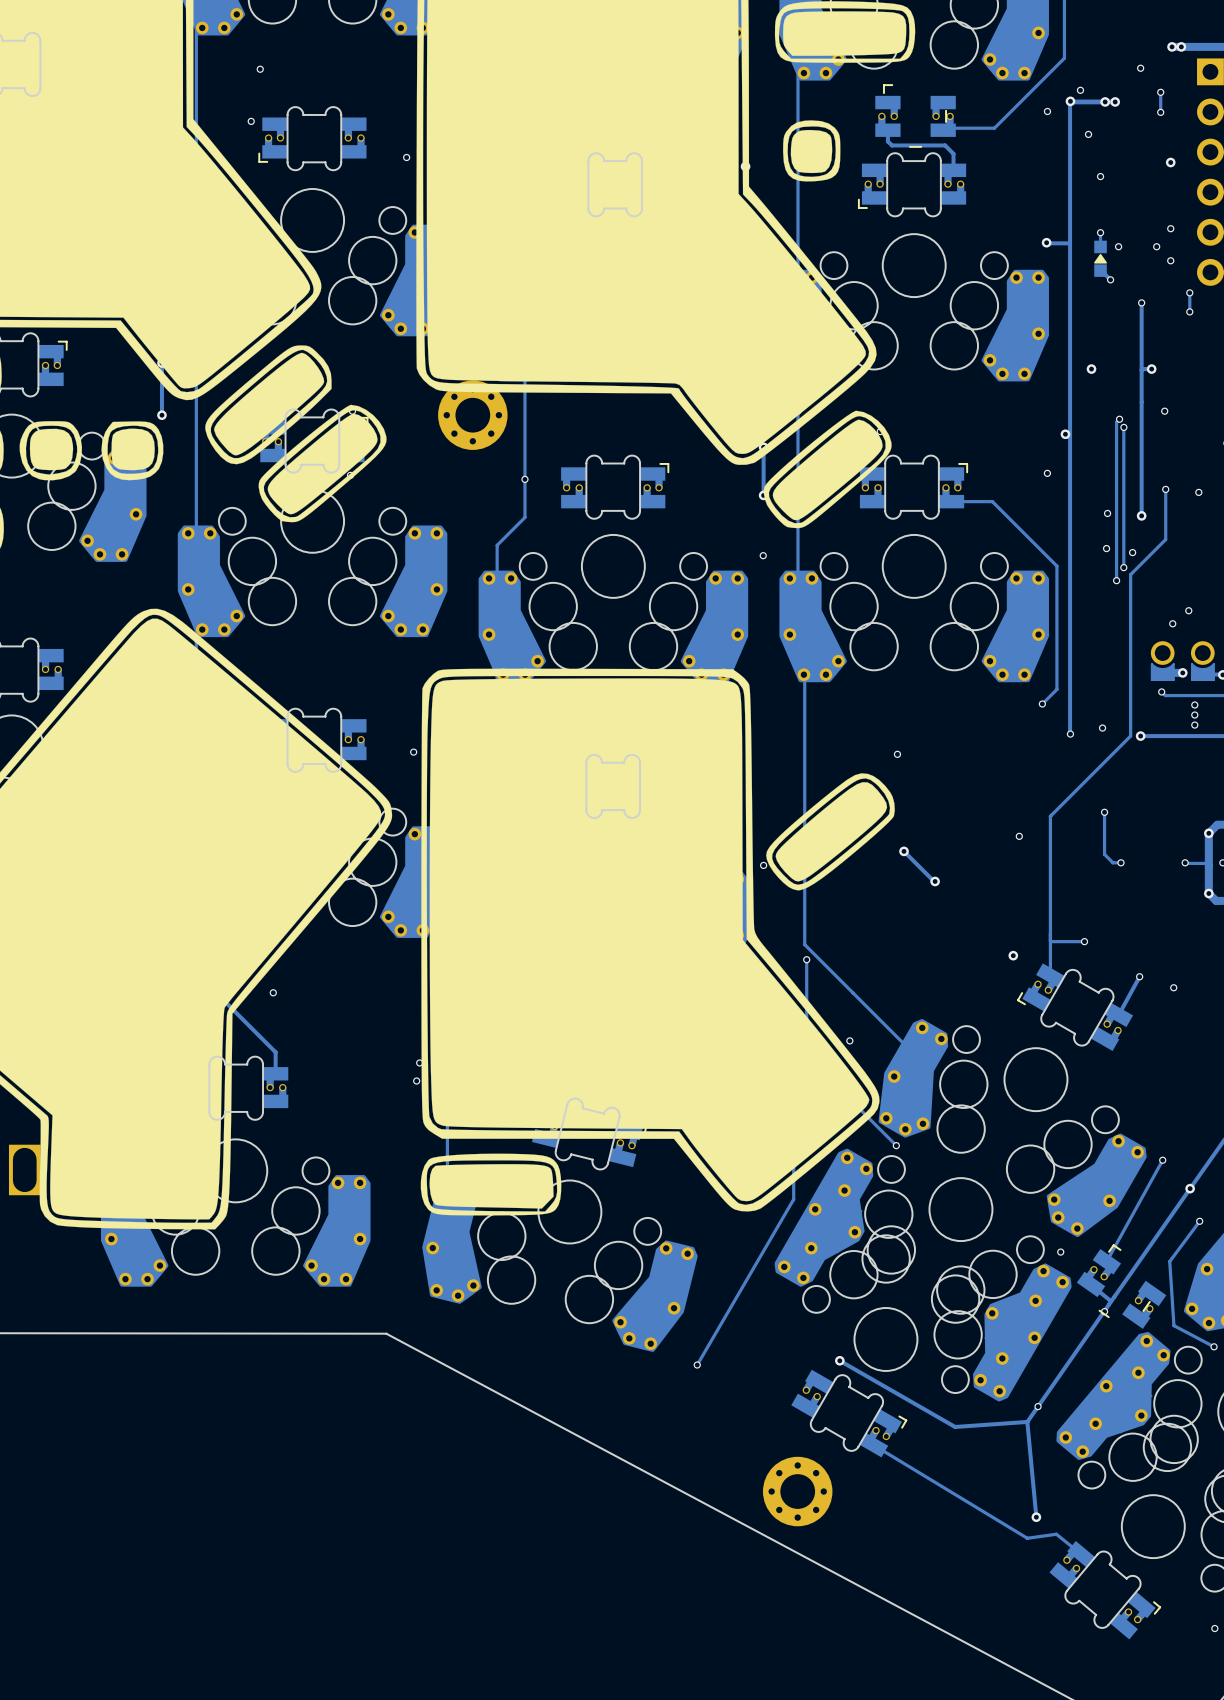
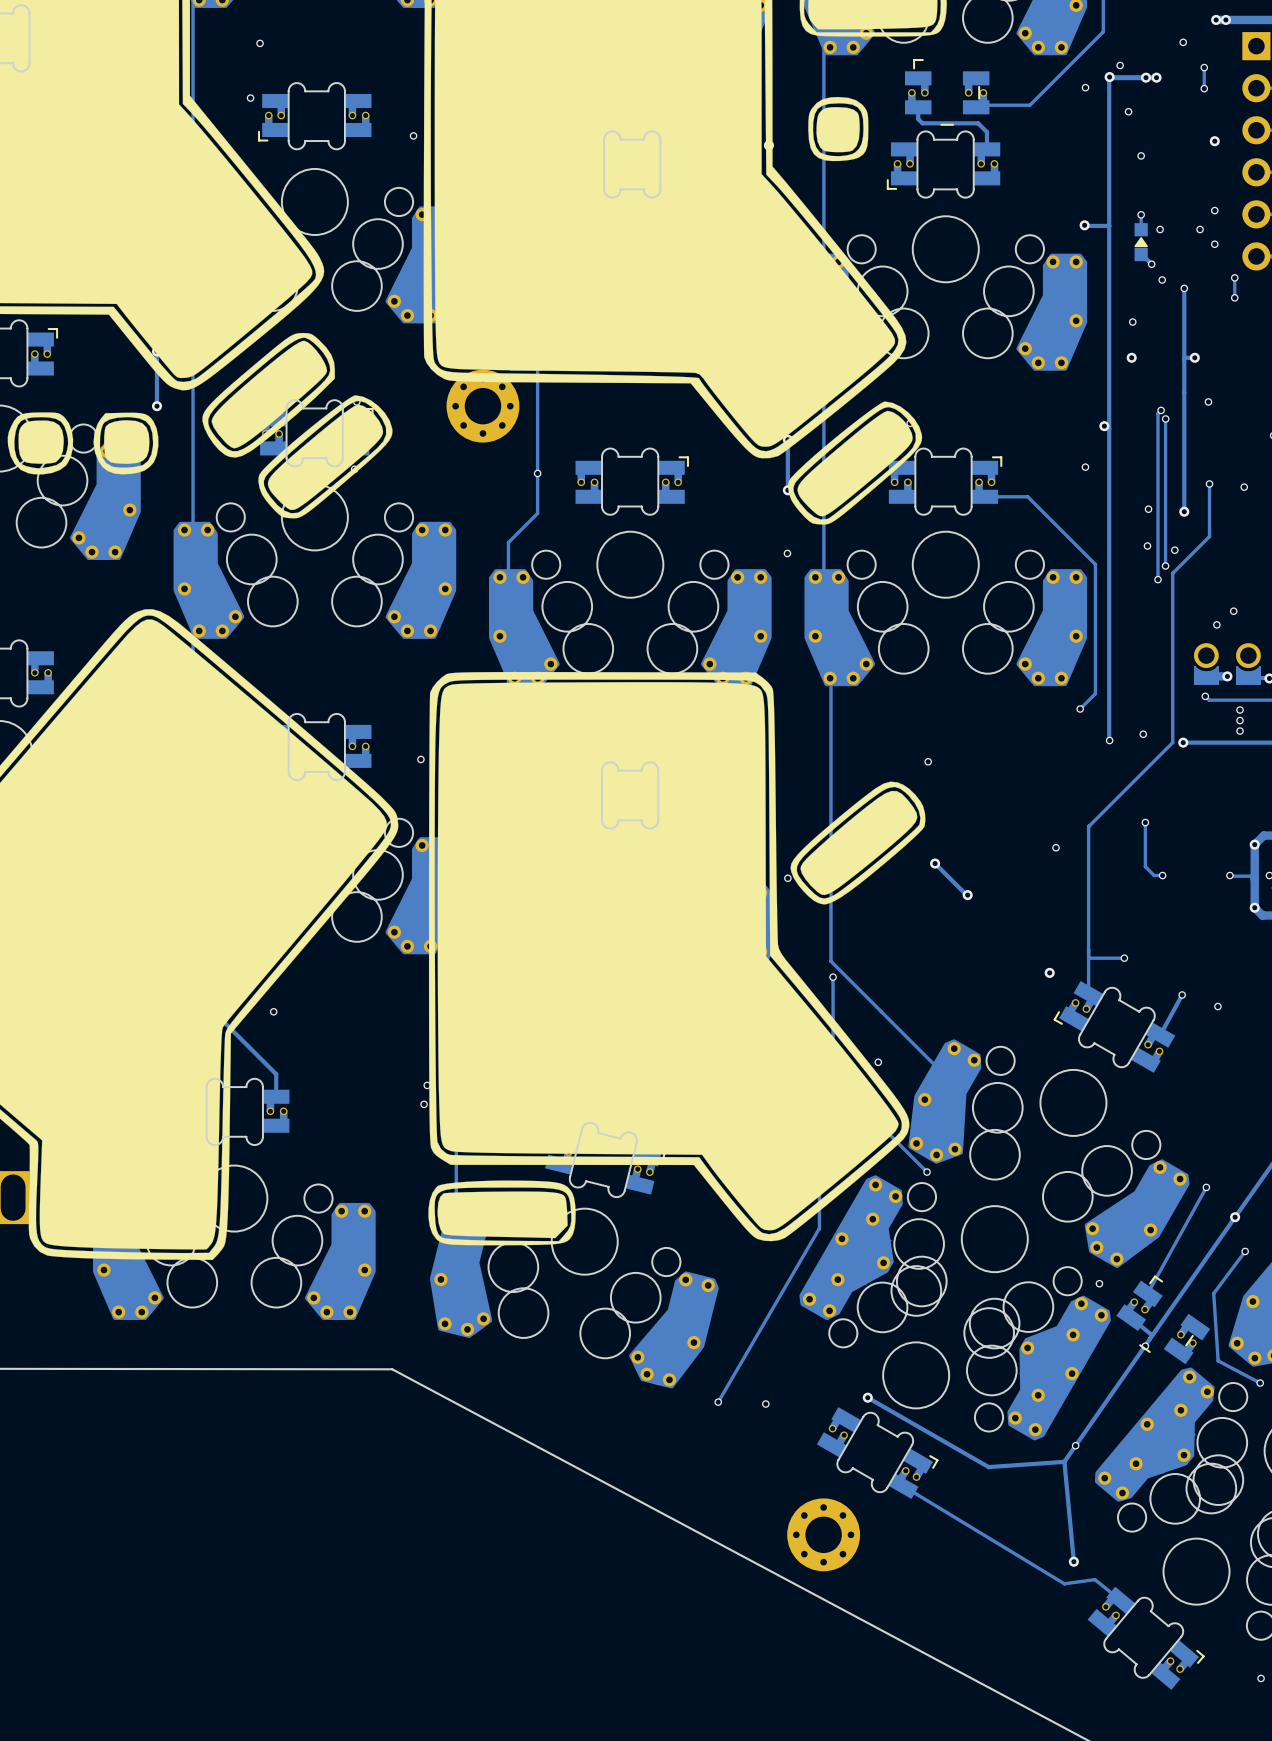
via: none -> (1162, 279)
via: none -> (1132, 322)
via: none -> (765, 1404)

